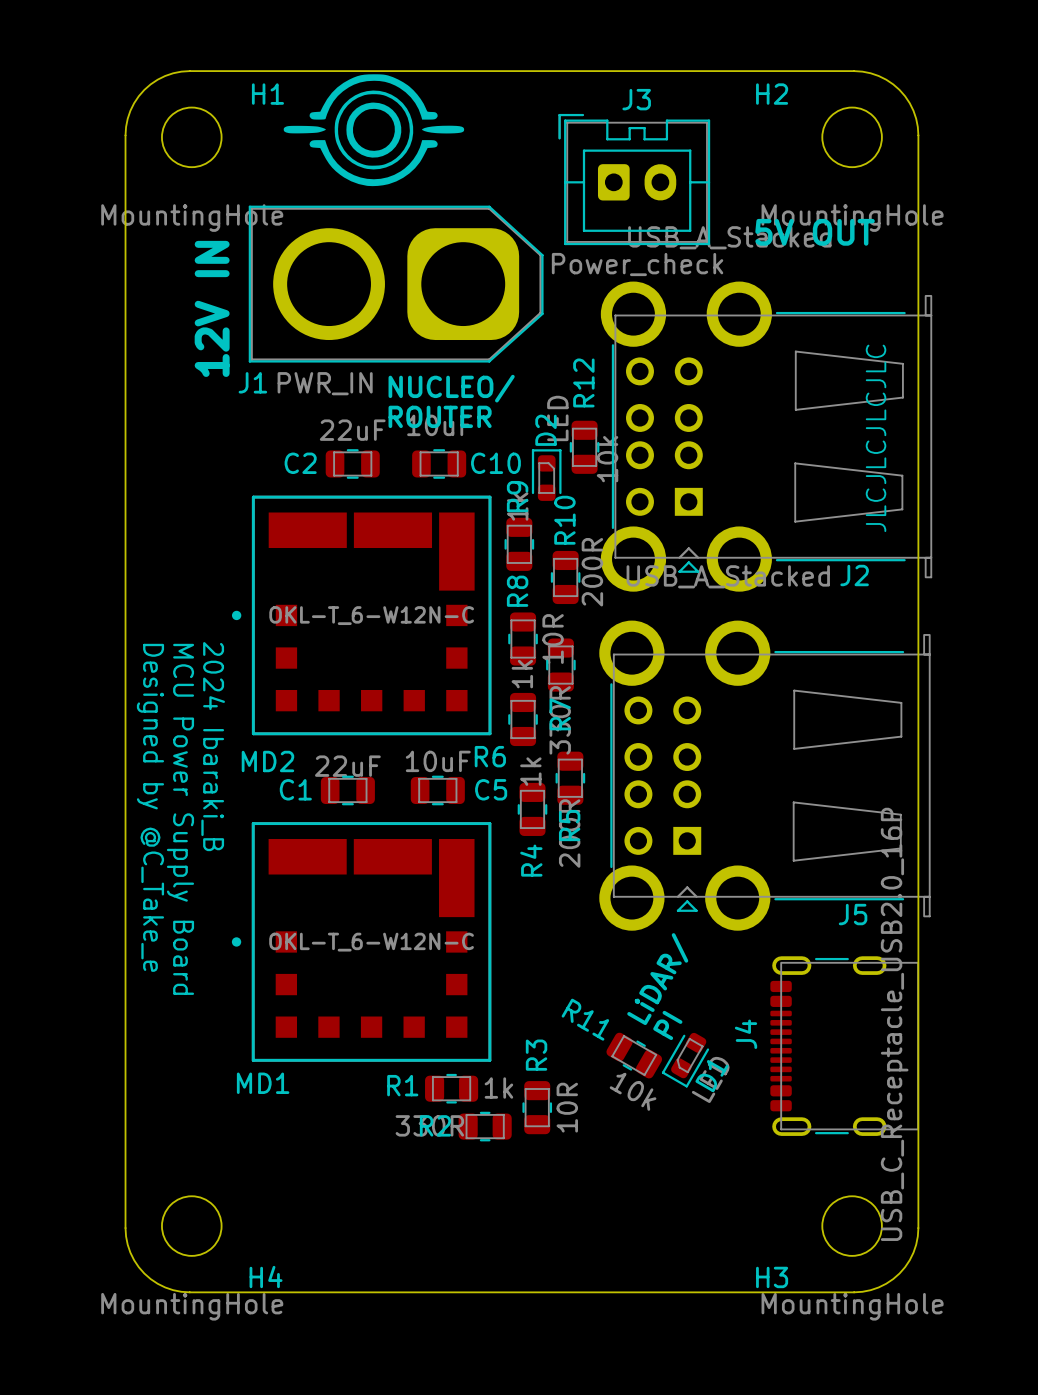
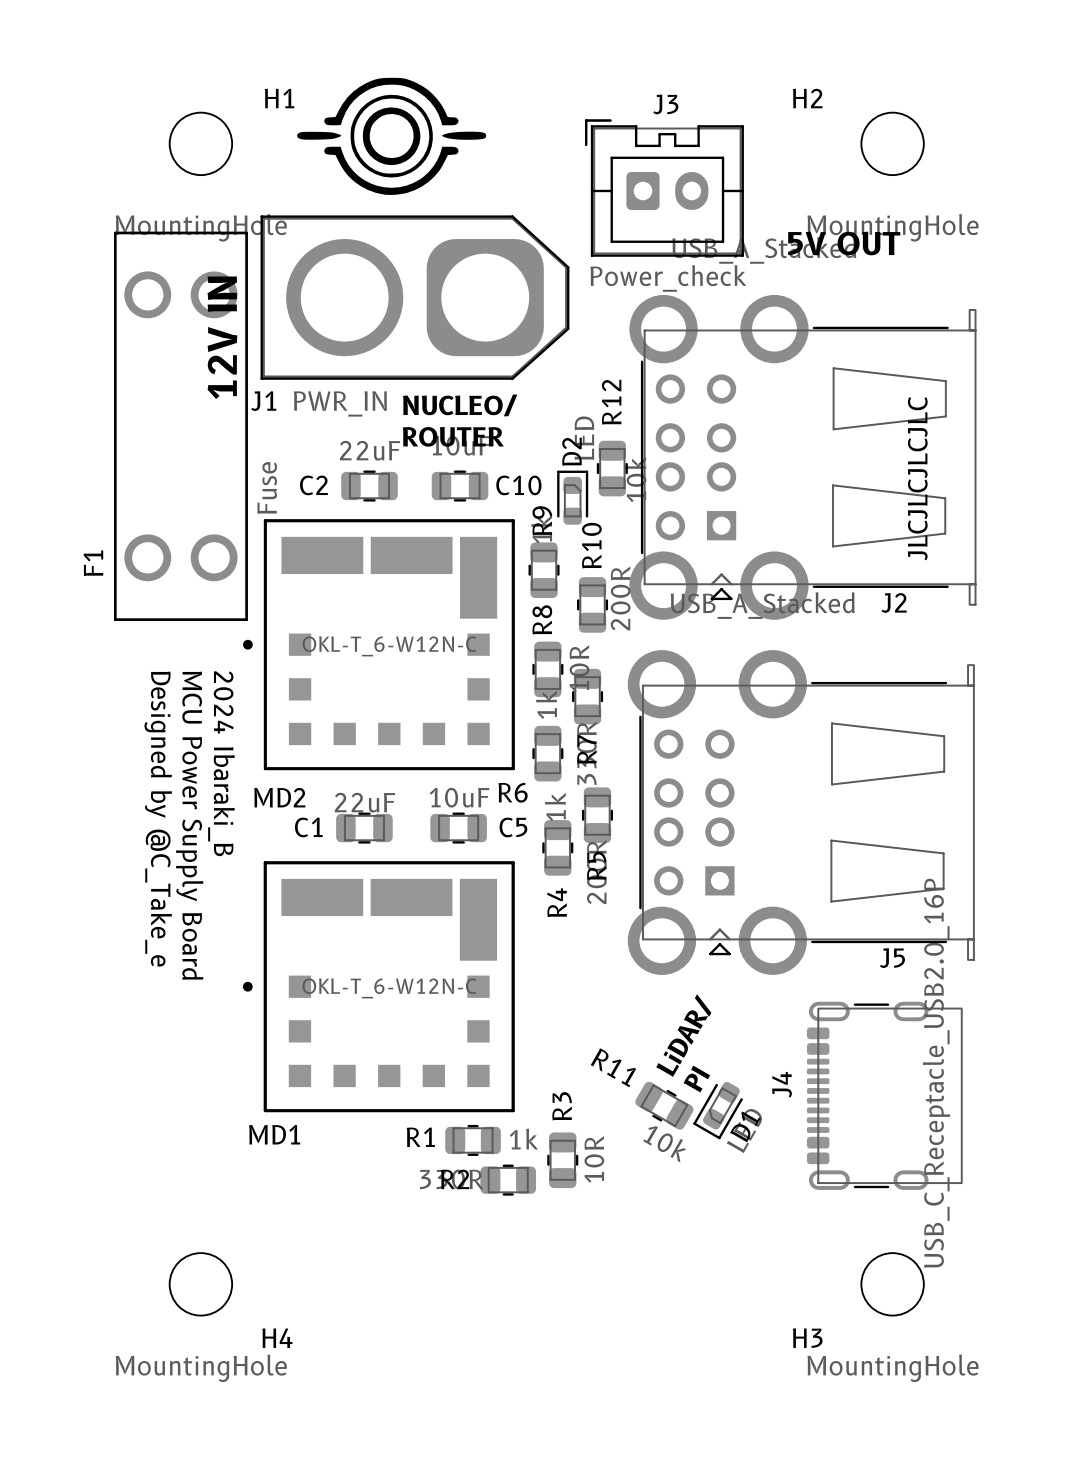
board edge: (189, 71) (854, 71) (870, 73) (886, 79) (899, 89) (909, 103) (916, 118) (918, 135) (918, 1228) (916, 1244) (909, 1260) (899, 1273) (886, 1283) (870, 1290) (854, 1292) (189, 1292) (173, 1290) (157, 1283) (144, 1273) (134, 1260) (127, 1244) (125, 1228) (125, 135) (130, 110) (144, 89) (165, 75) (189, 71) -> none
F1: none -> Fuse (180, 426)

